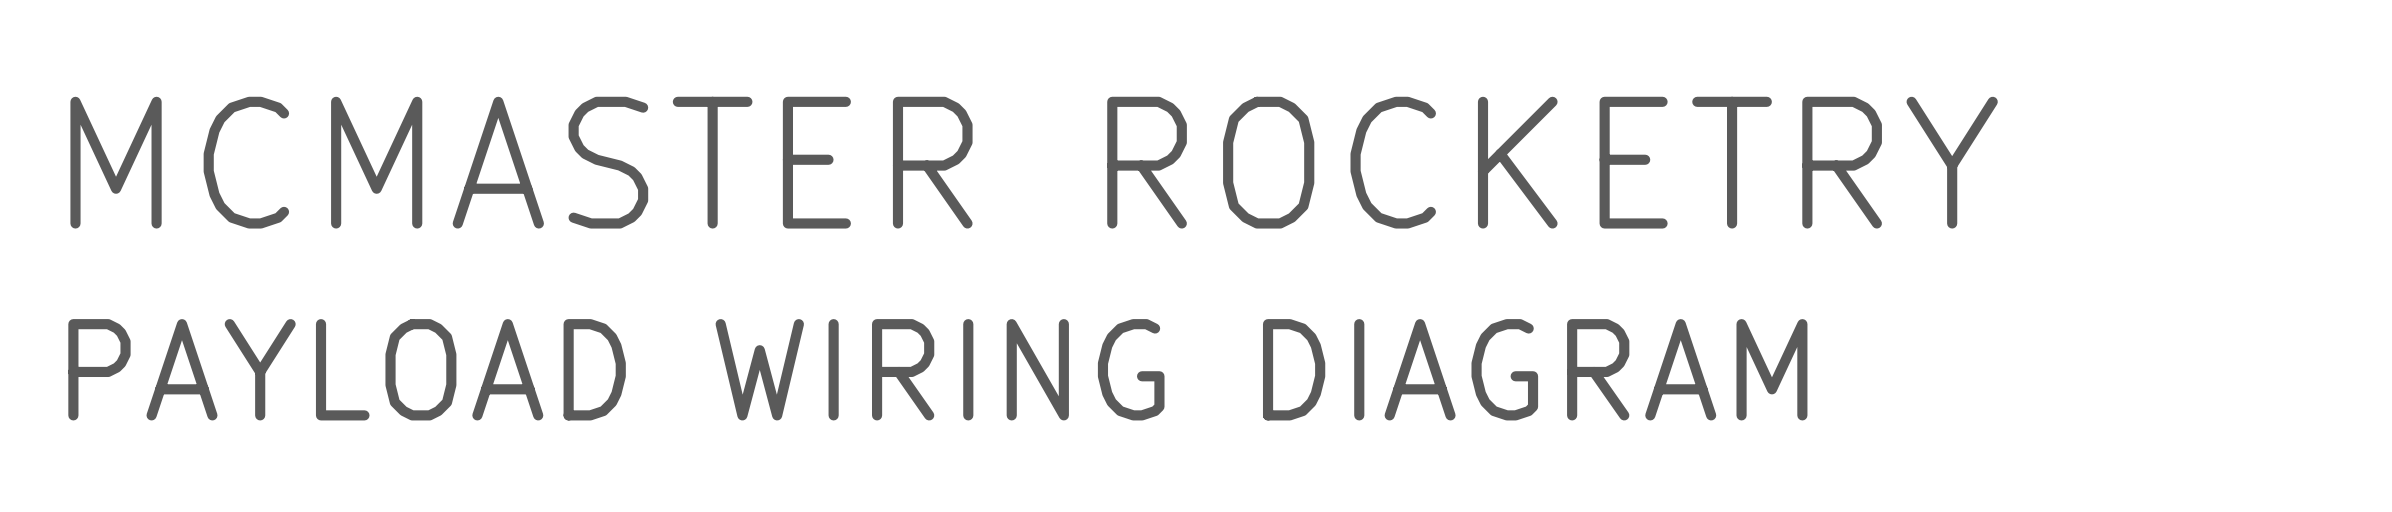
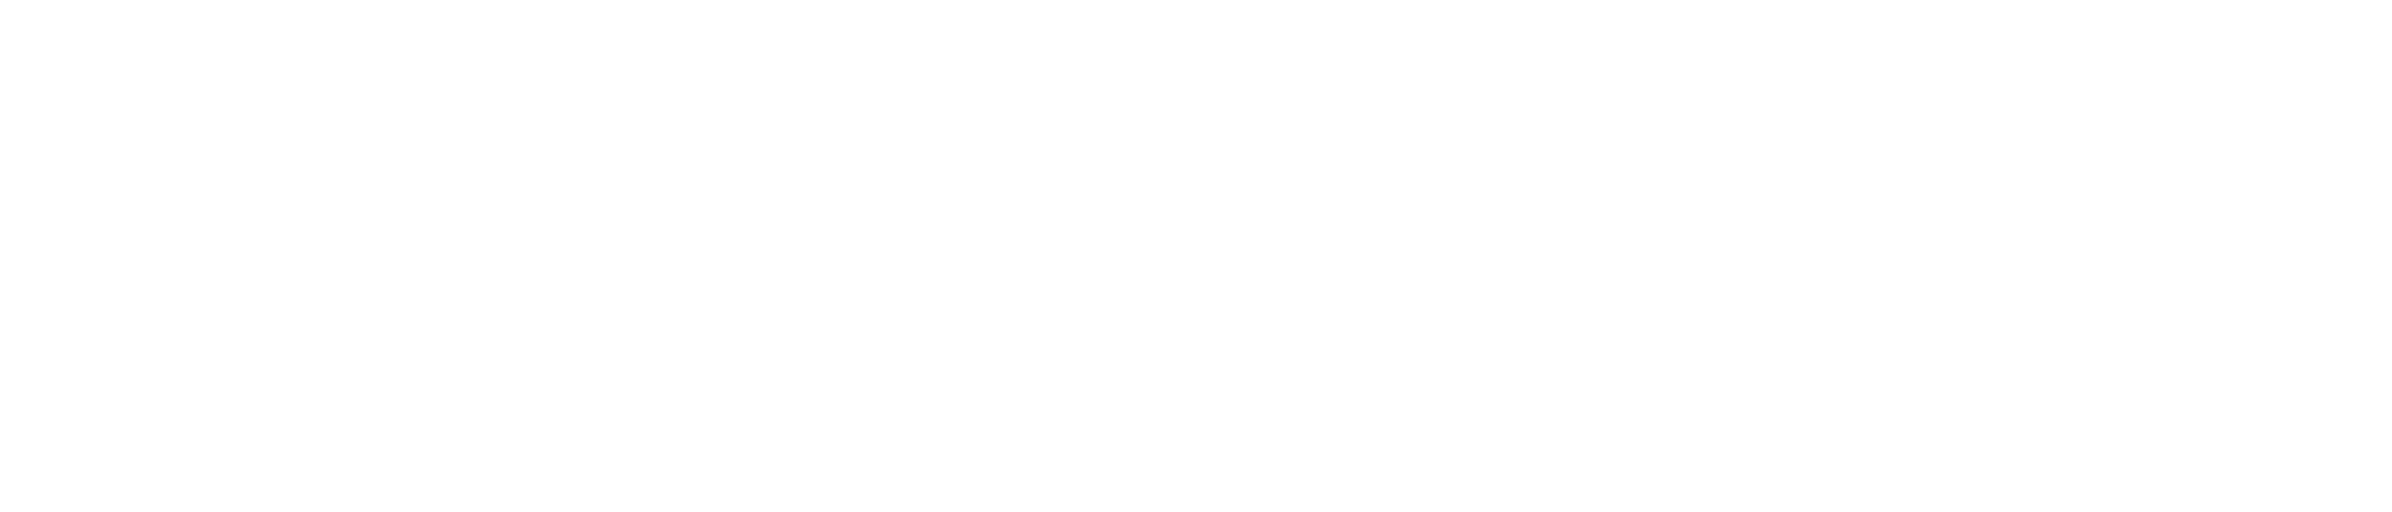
text: MCMASTER ROCKETRY (1034, 162) -> none
text: PAYLOAD WIRING DIAGRAM (937, 369) -> none

